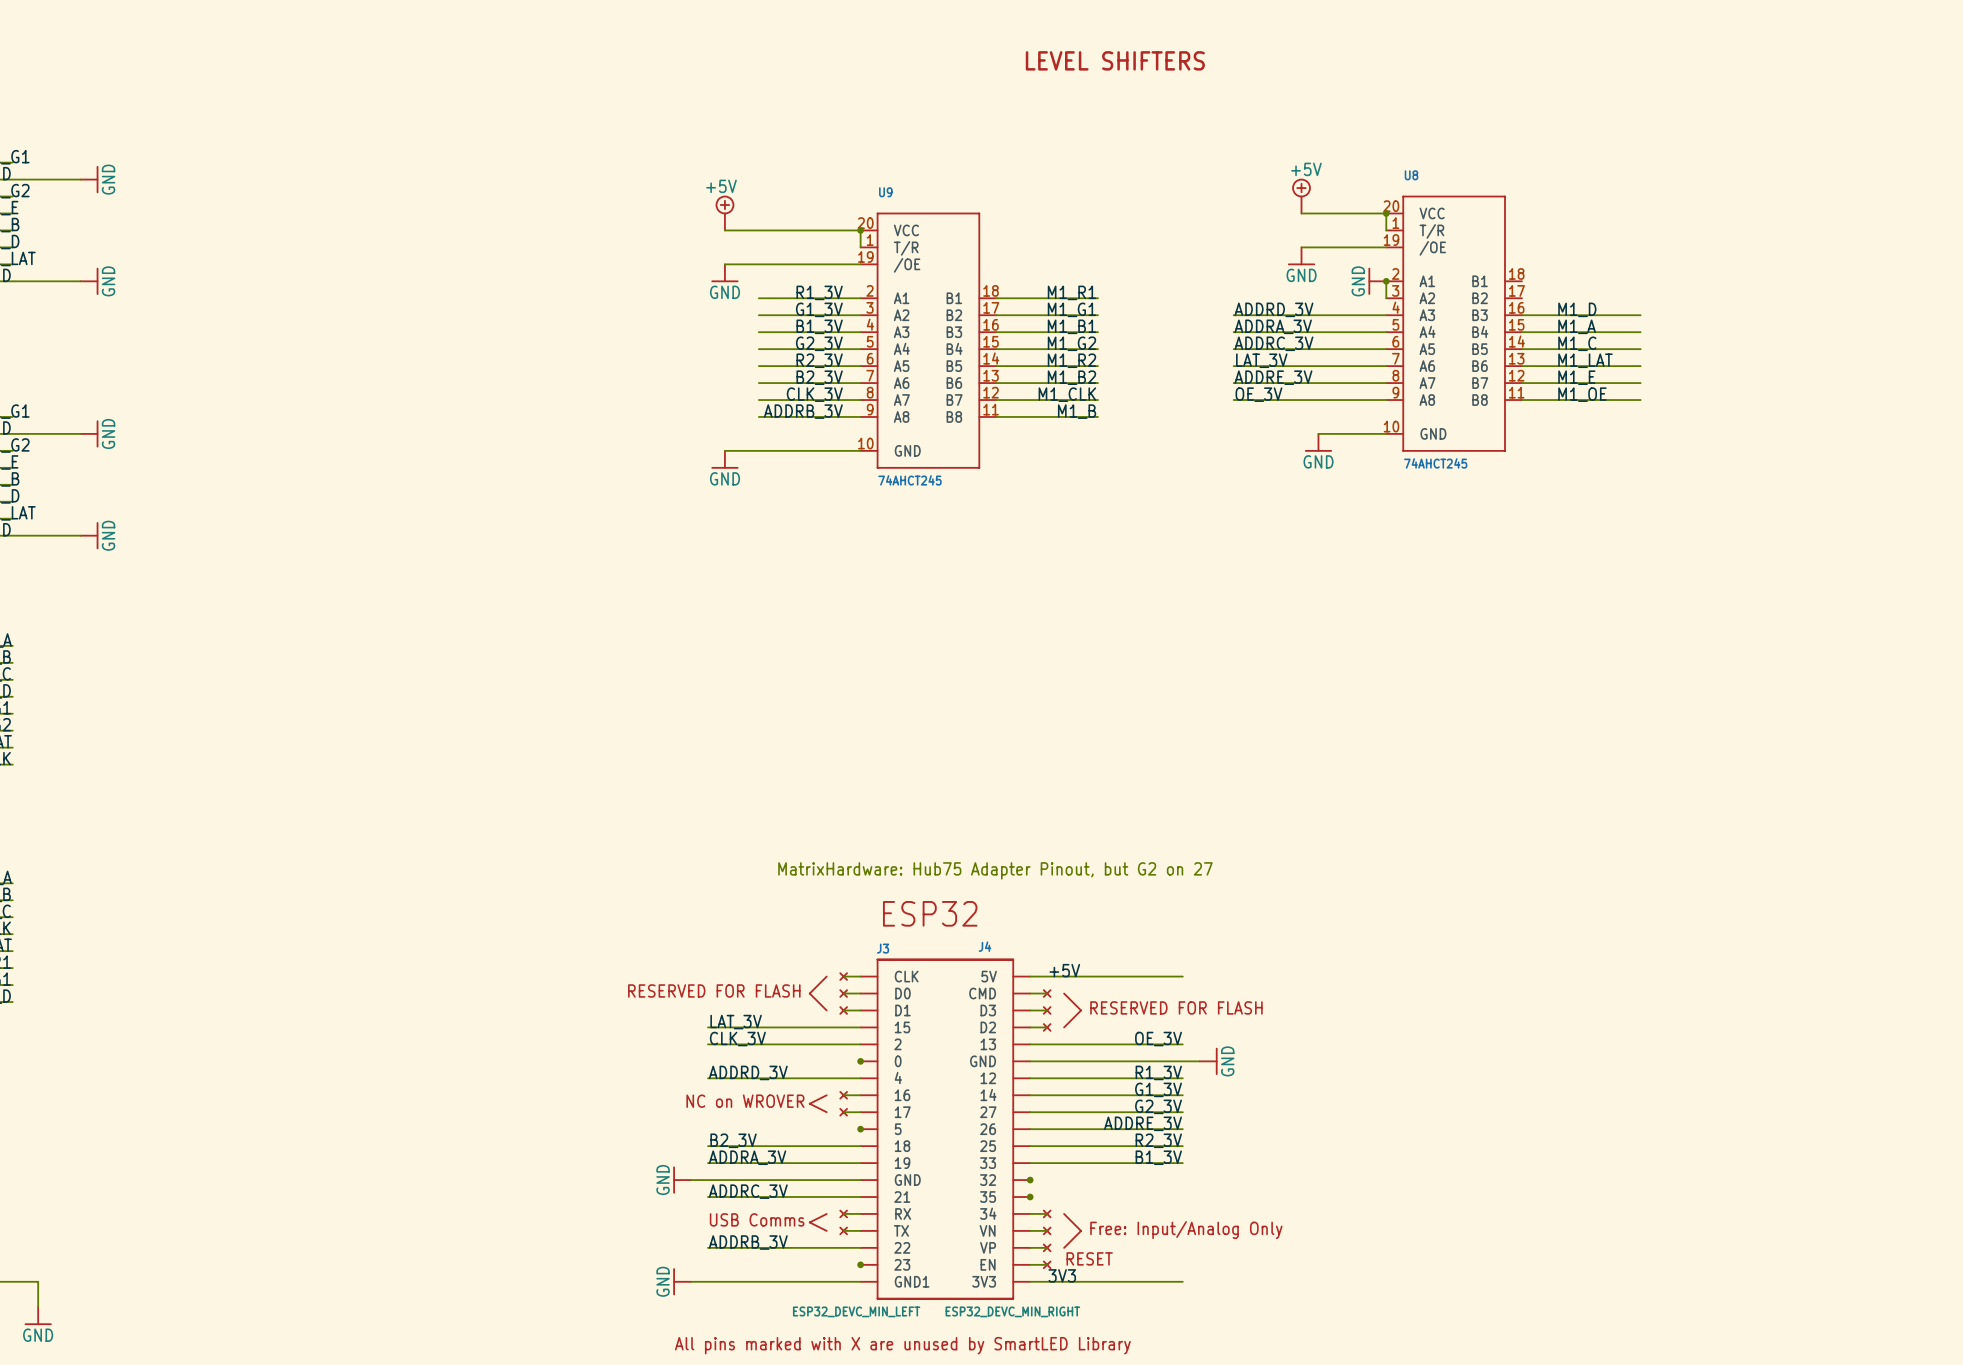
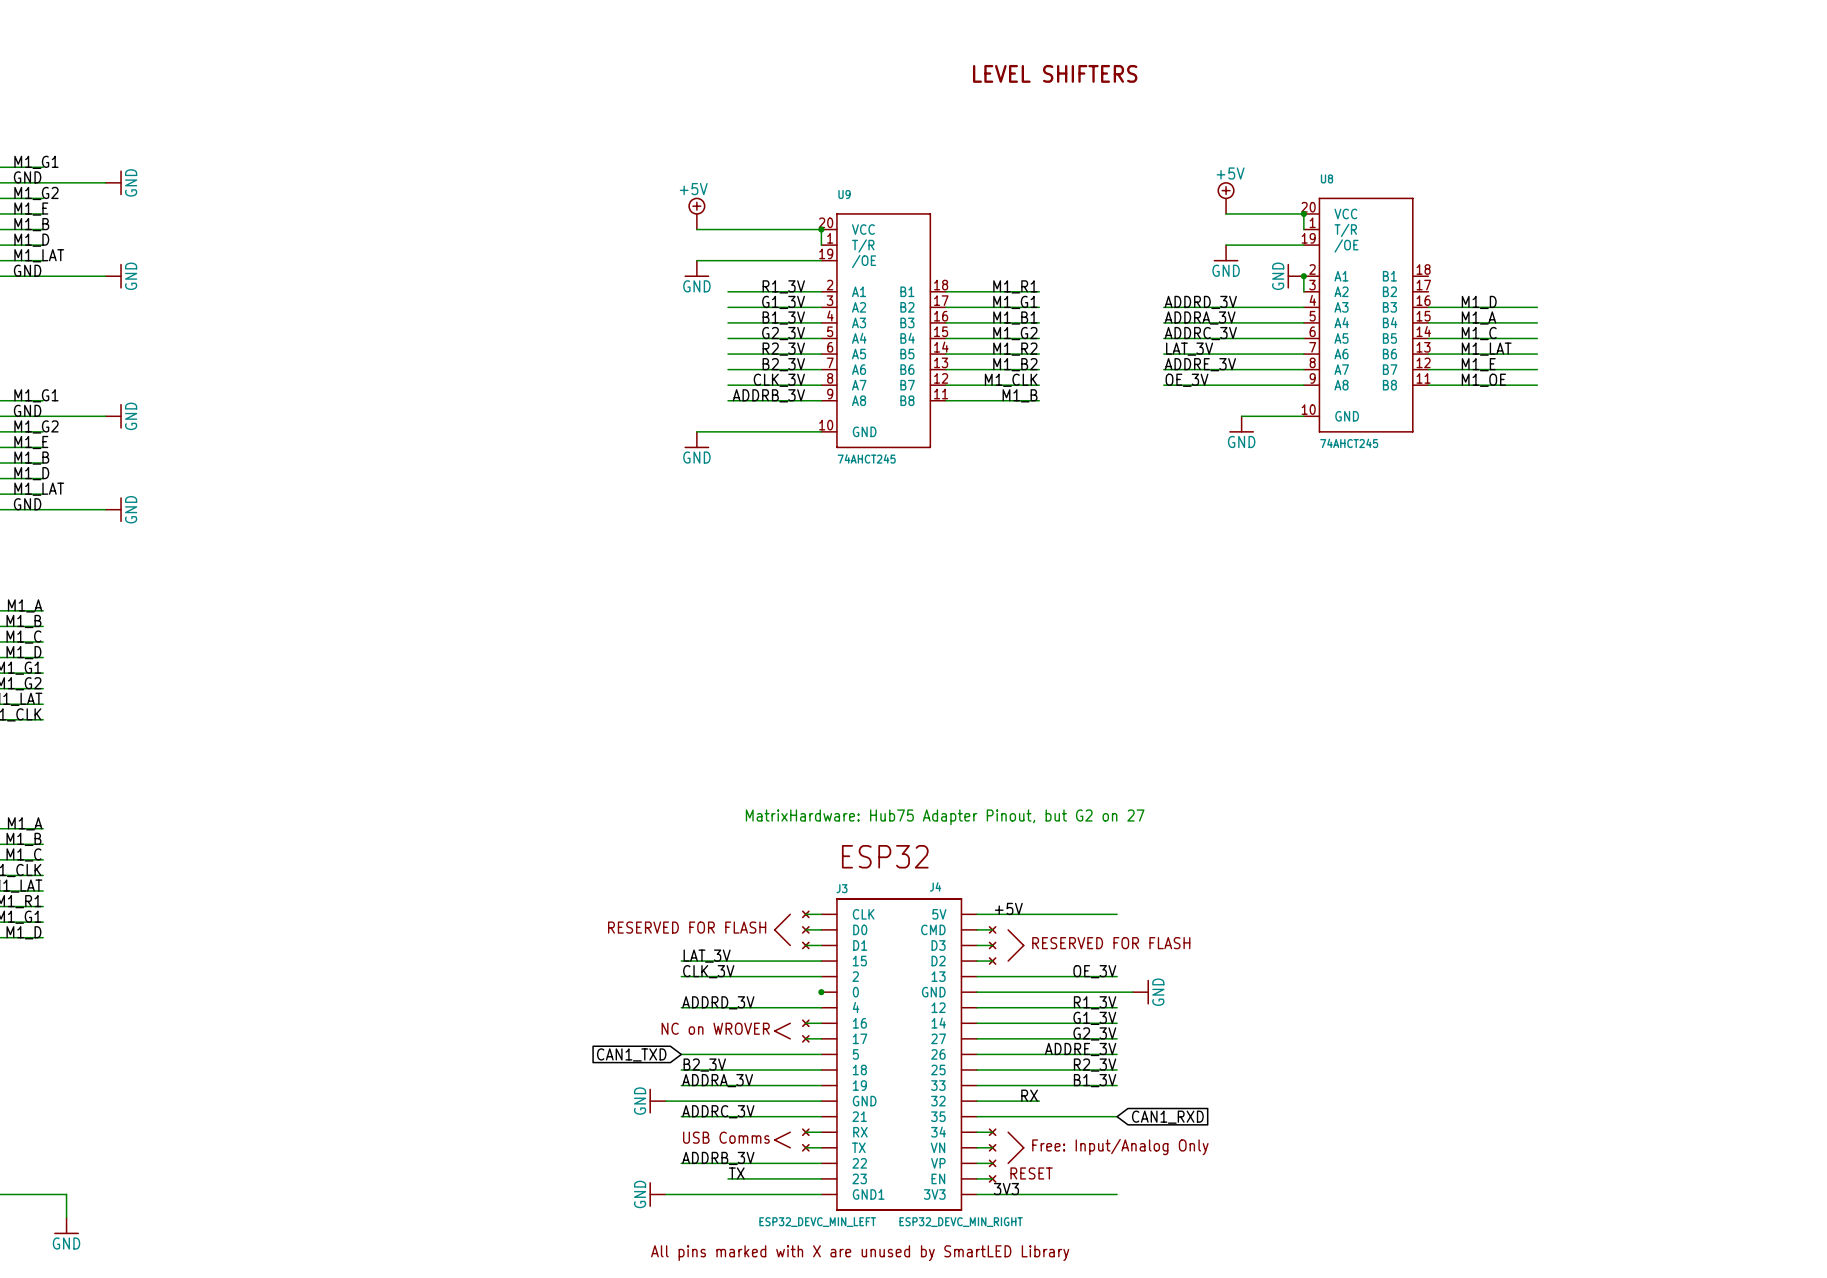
global label: none -> CAN1_TXD (631, 1054)
wire: none -> (681, 1054) (821, 1054)
junction: (860, 1129) -> none
label: none -> RX (1029, 1095)
wire: none -> (977, 1101) (1039, 1101)
junction: (1030, 1180) -> none
wire: none -> (977, 1116) (1117, 1116)
junction: (1030, 1197) -> none
global label: none -> CAN1_RXD (1167, 1117)
label: none -> TX (736, 1173)
wire: none -> (728, 1178) (821, 1178)
junction: (860, 1264) -> none

